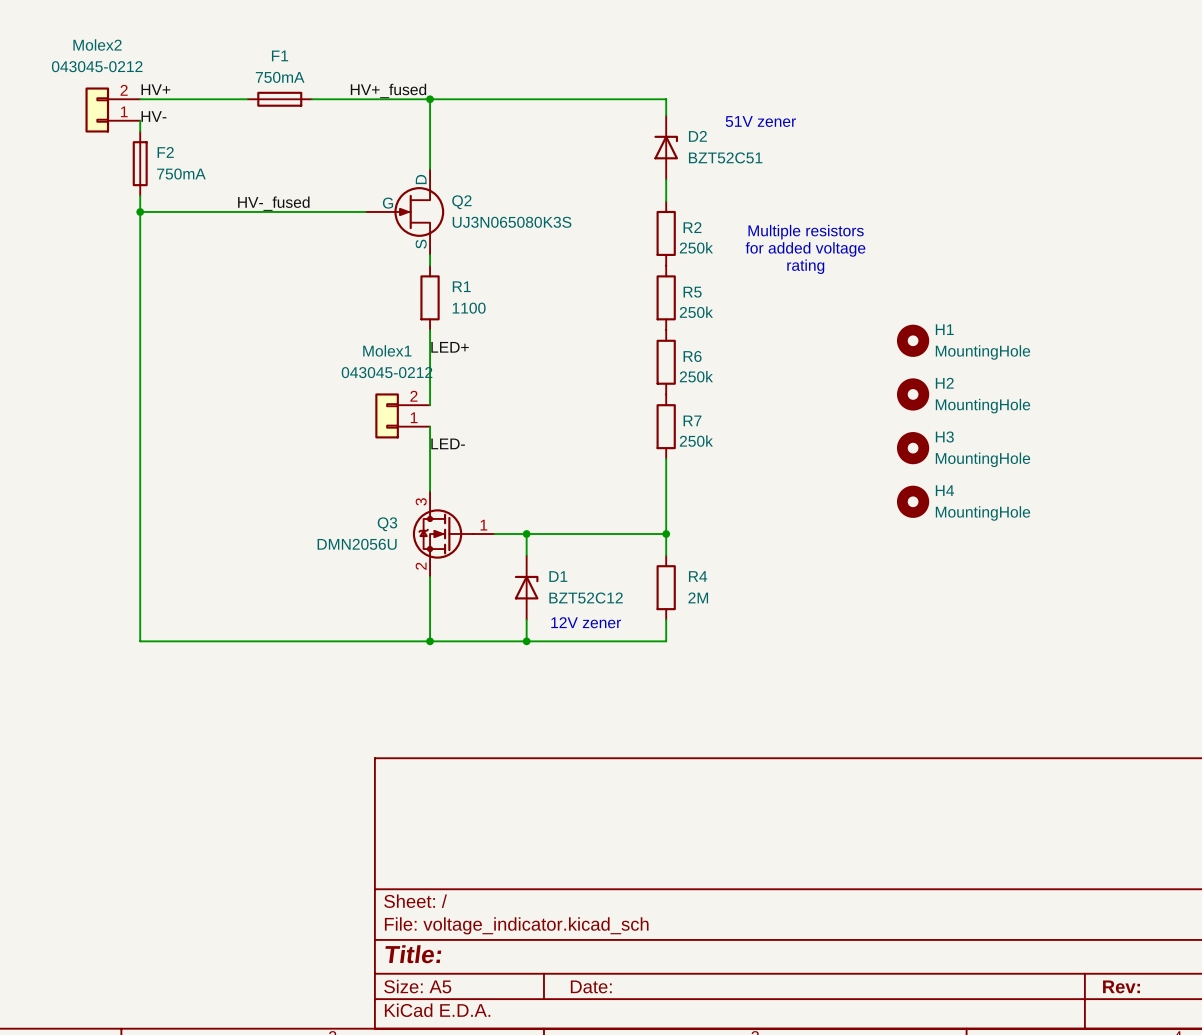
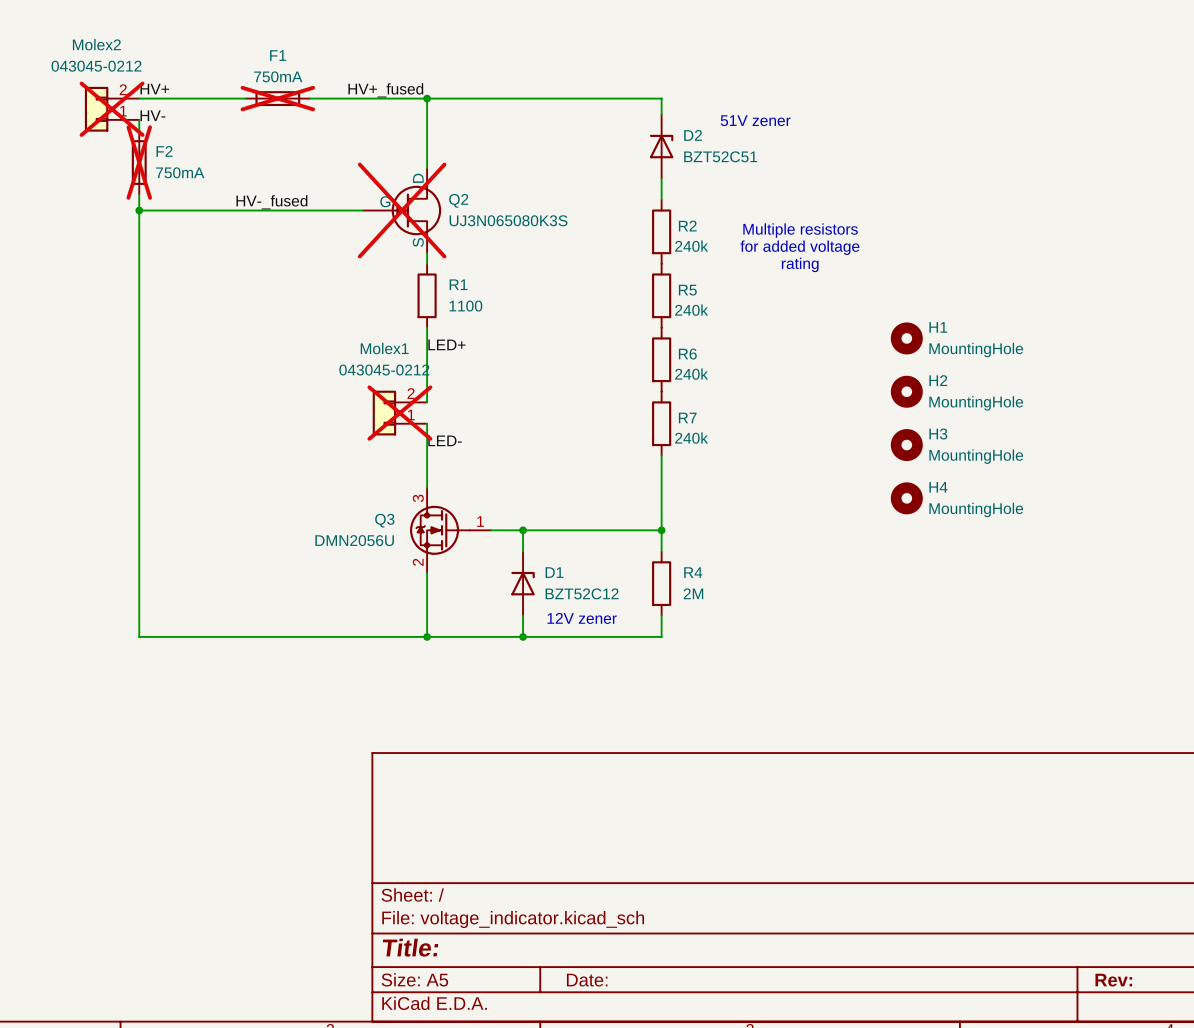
F1 do-not-place cross: none -> (277, 98)
Molex2 do-not-place cross: none -> (112, 109)
F2 do-not-place cross: none -> (139, 162)
Q2 do-not-place cross: none -> (402, 210)
R2 value: 250k (696, 247) -> 240k (691, 246)
R5 value: 250k (696, 312) -> 240k (691, 310)
R6 value: 250k (696, 376) -> 240k (691, 374)
Molex1 do-not-place cross: none -> (399, 413)
R7 value: 250k (696, 441) -> 240k (691, 438)

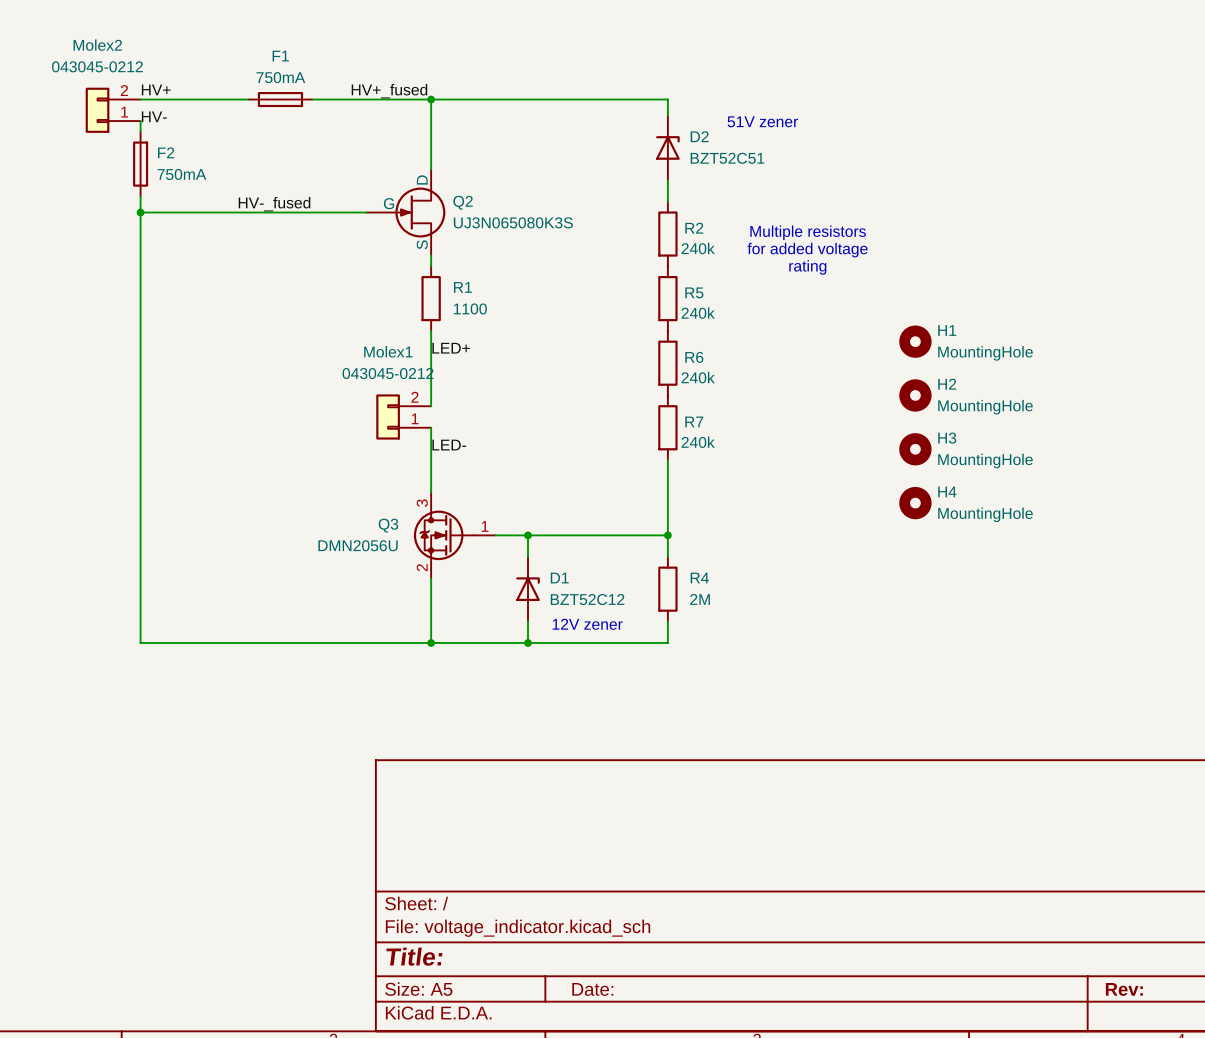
F1 do-not-place cross: (277, 98) -> none
Molex2 do-not-place cross: (112, 109) -> none
F2 do-not-place cross: (139, 162) -> none
Q2 do-not-place cross: (402, 210) -> none
Molex1 do-not-place cross: (399, 413) -> none

